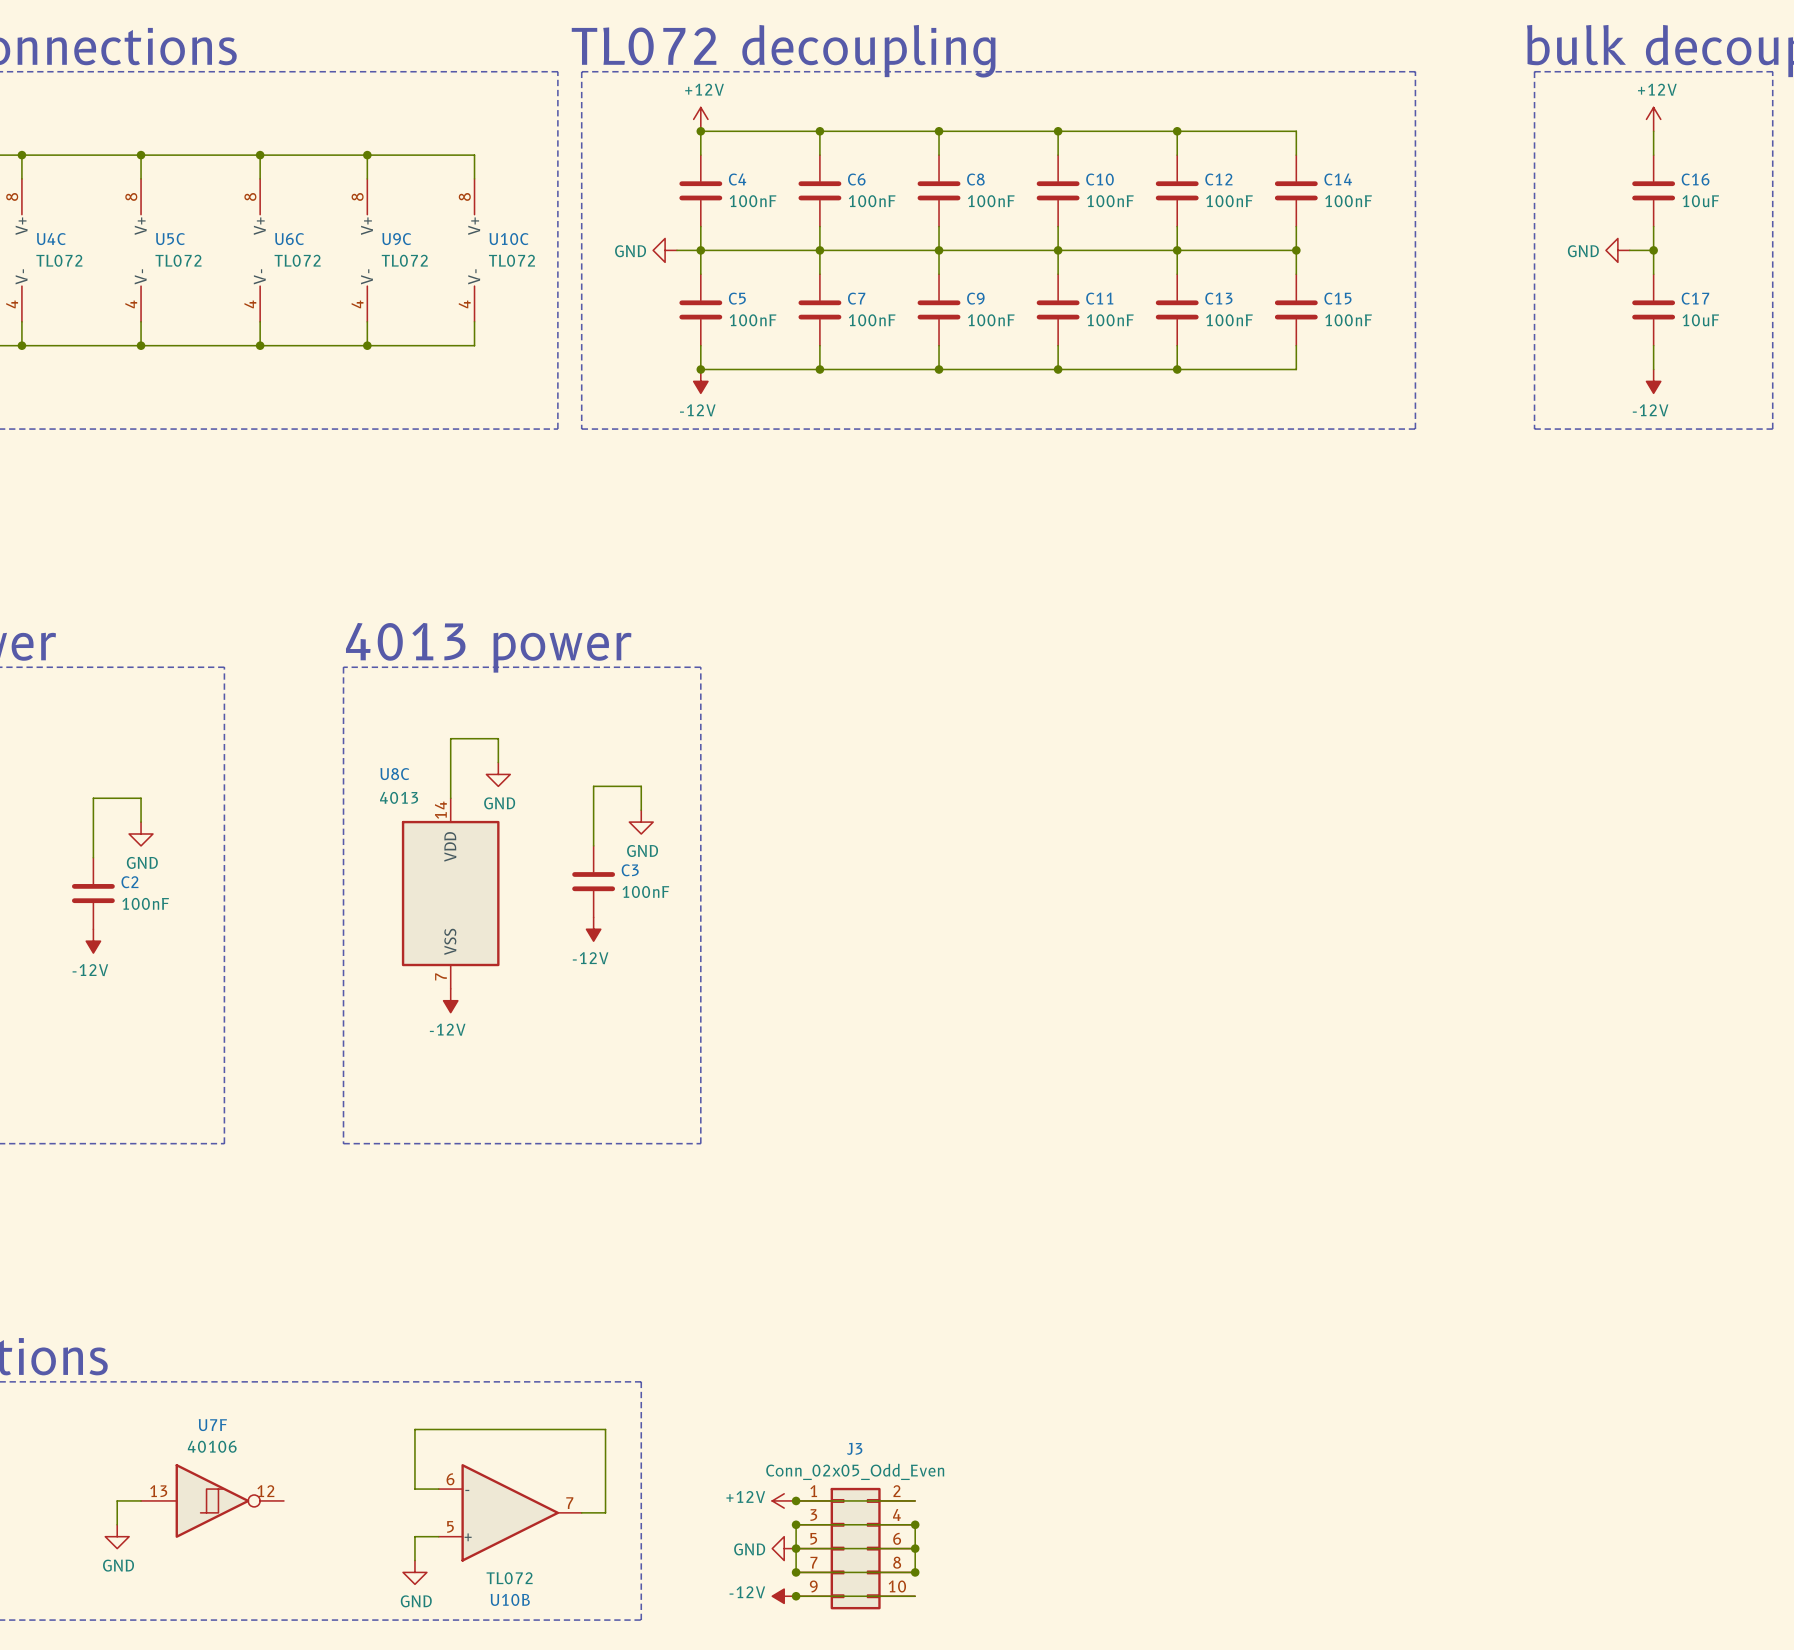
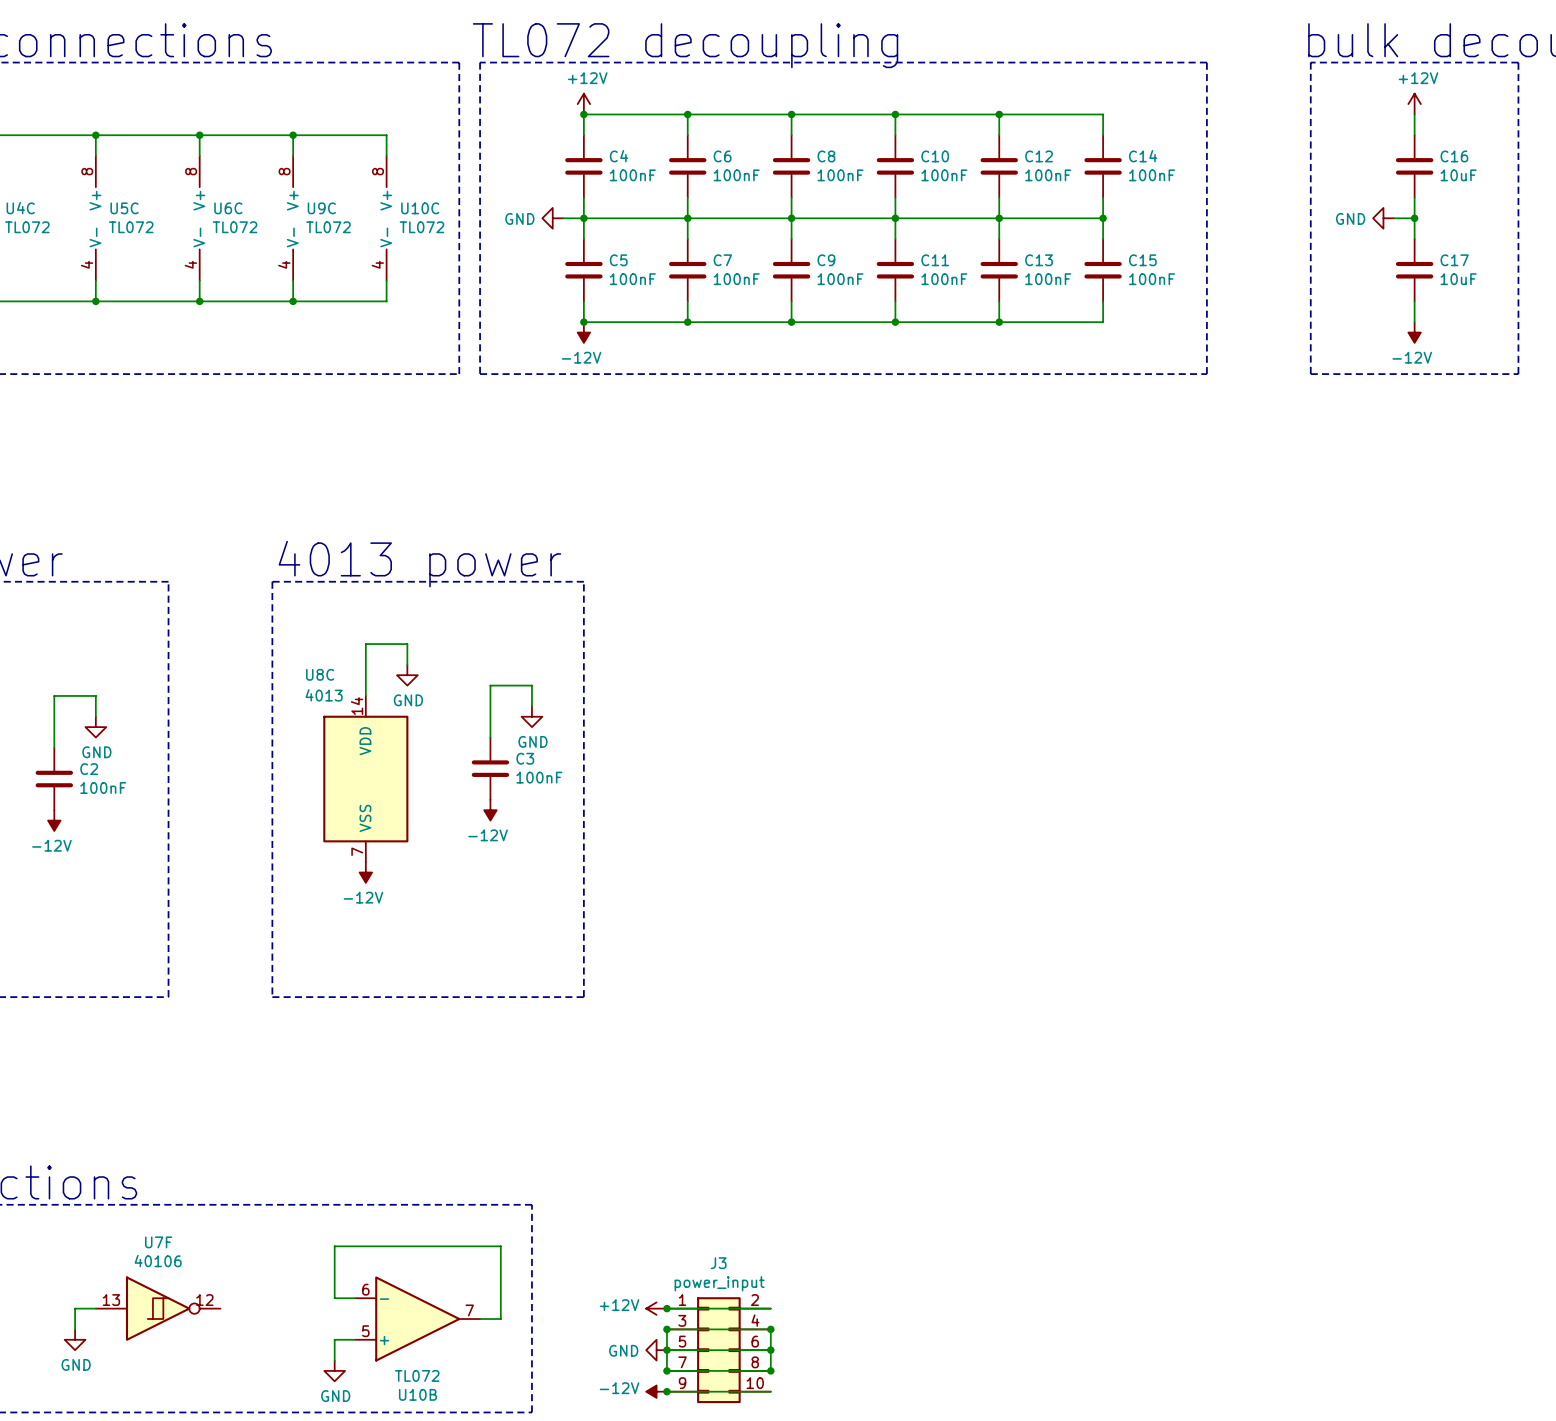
J3 value: Conn_02x05_Odd_Even (855, 1471) -> power_input (719, 1283)

